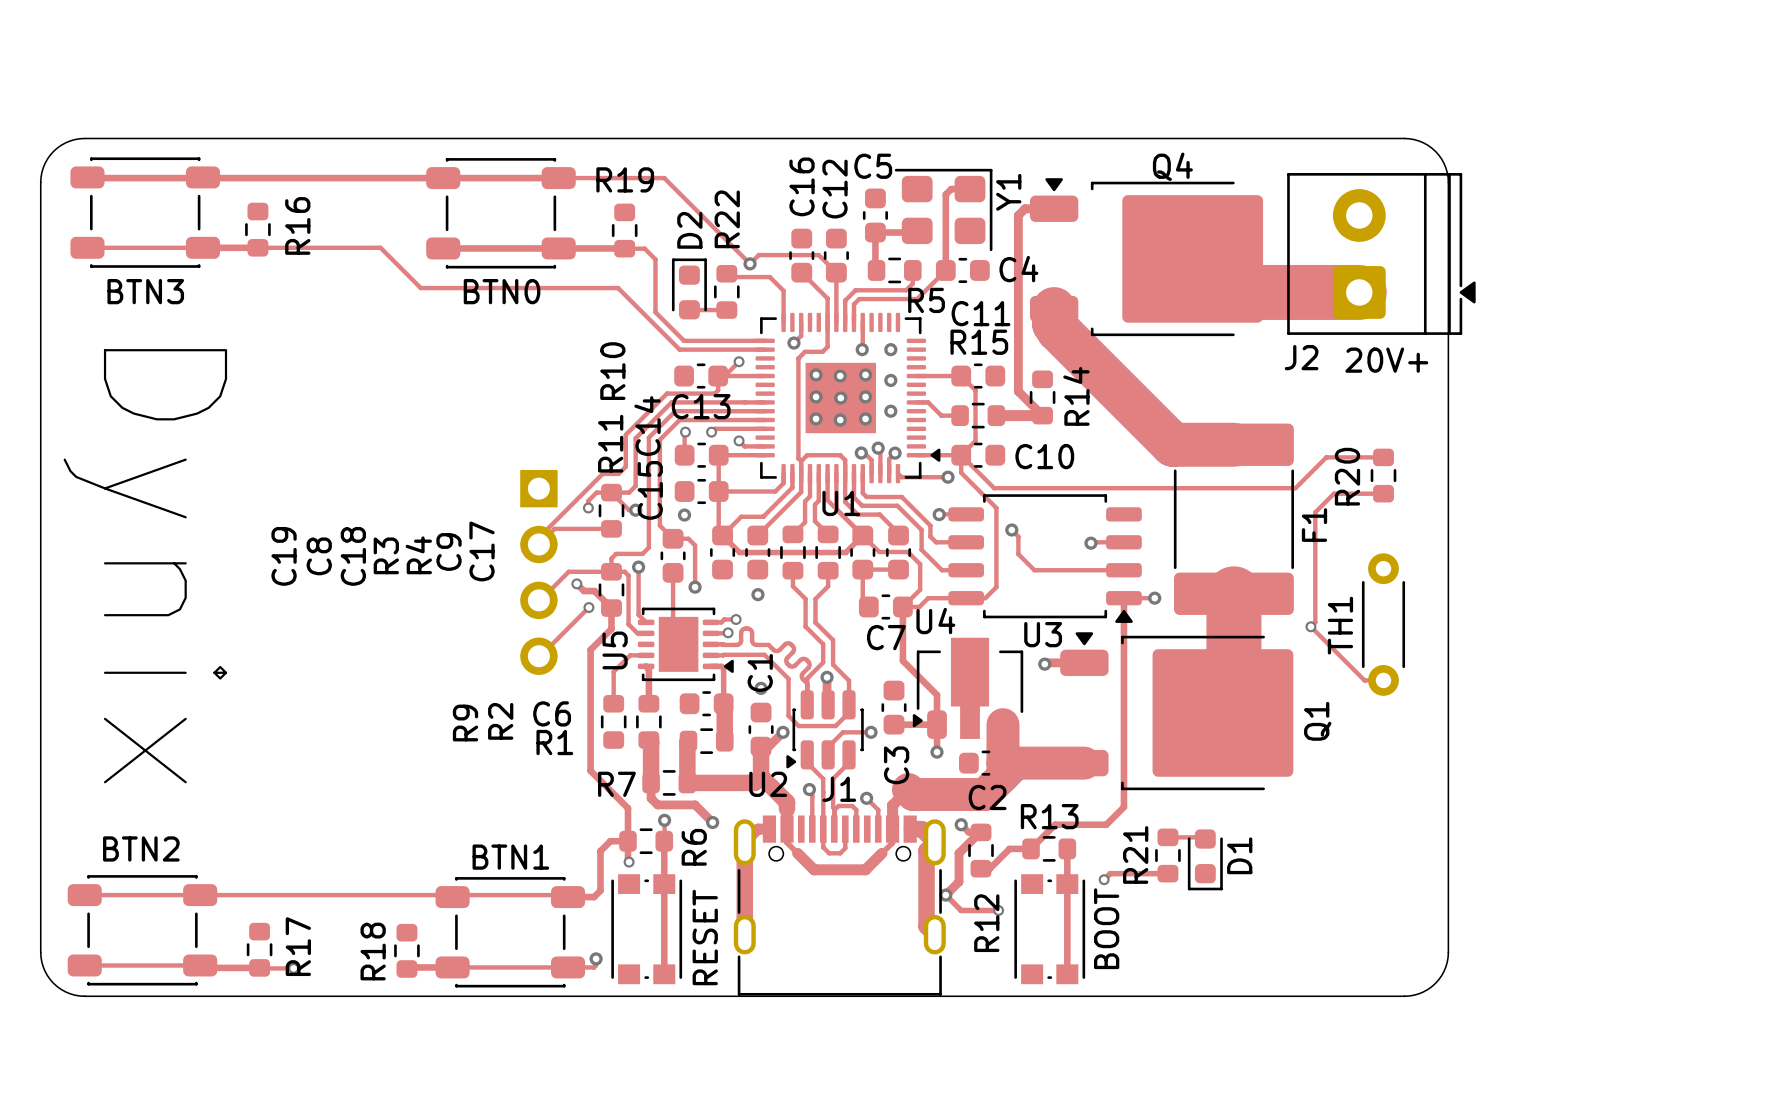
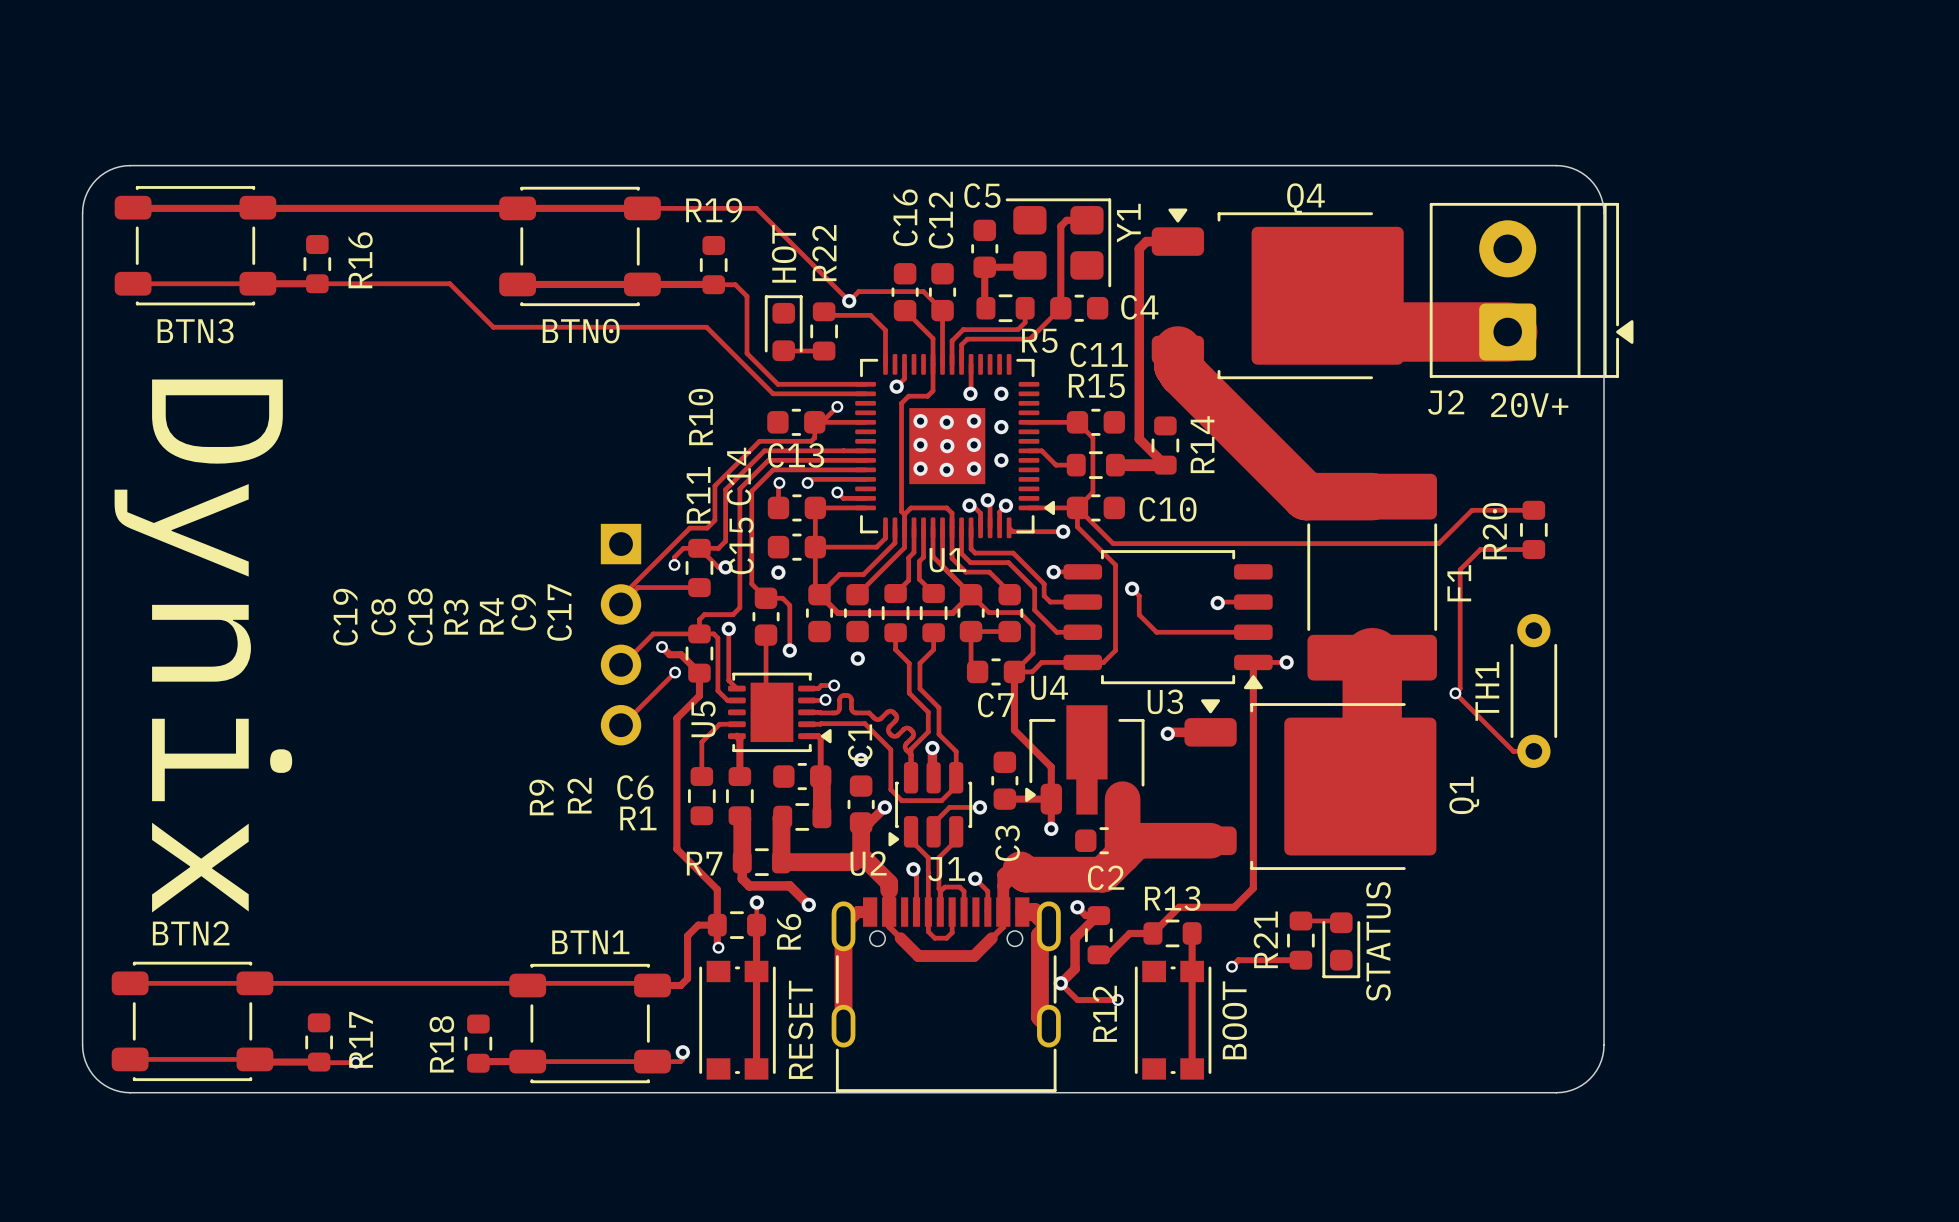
D2 name: D2 (689, 230) -> HOT (784, 253)
track: none -> (1004, 872) (1003, 886)
D1 name: D1 (1239, 855) -> STATUS (1378, 941)

